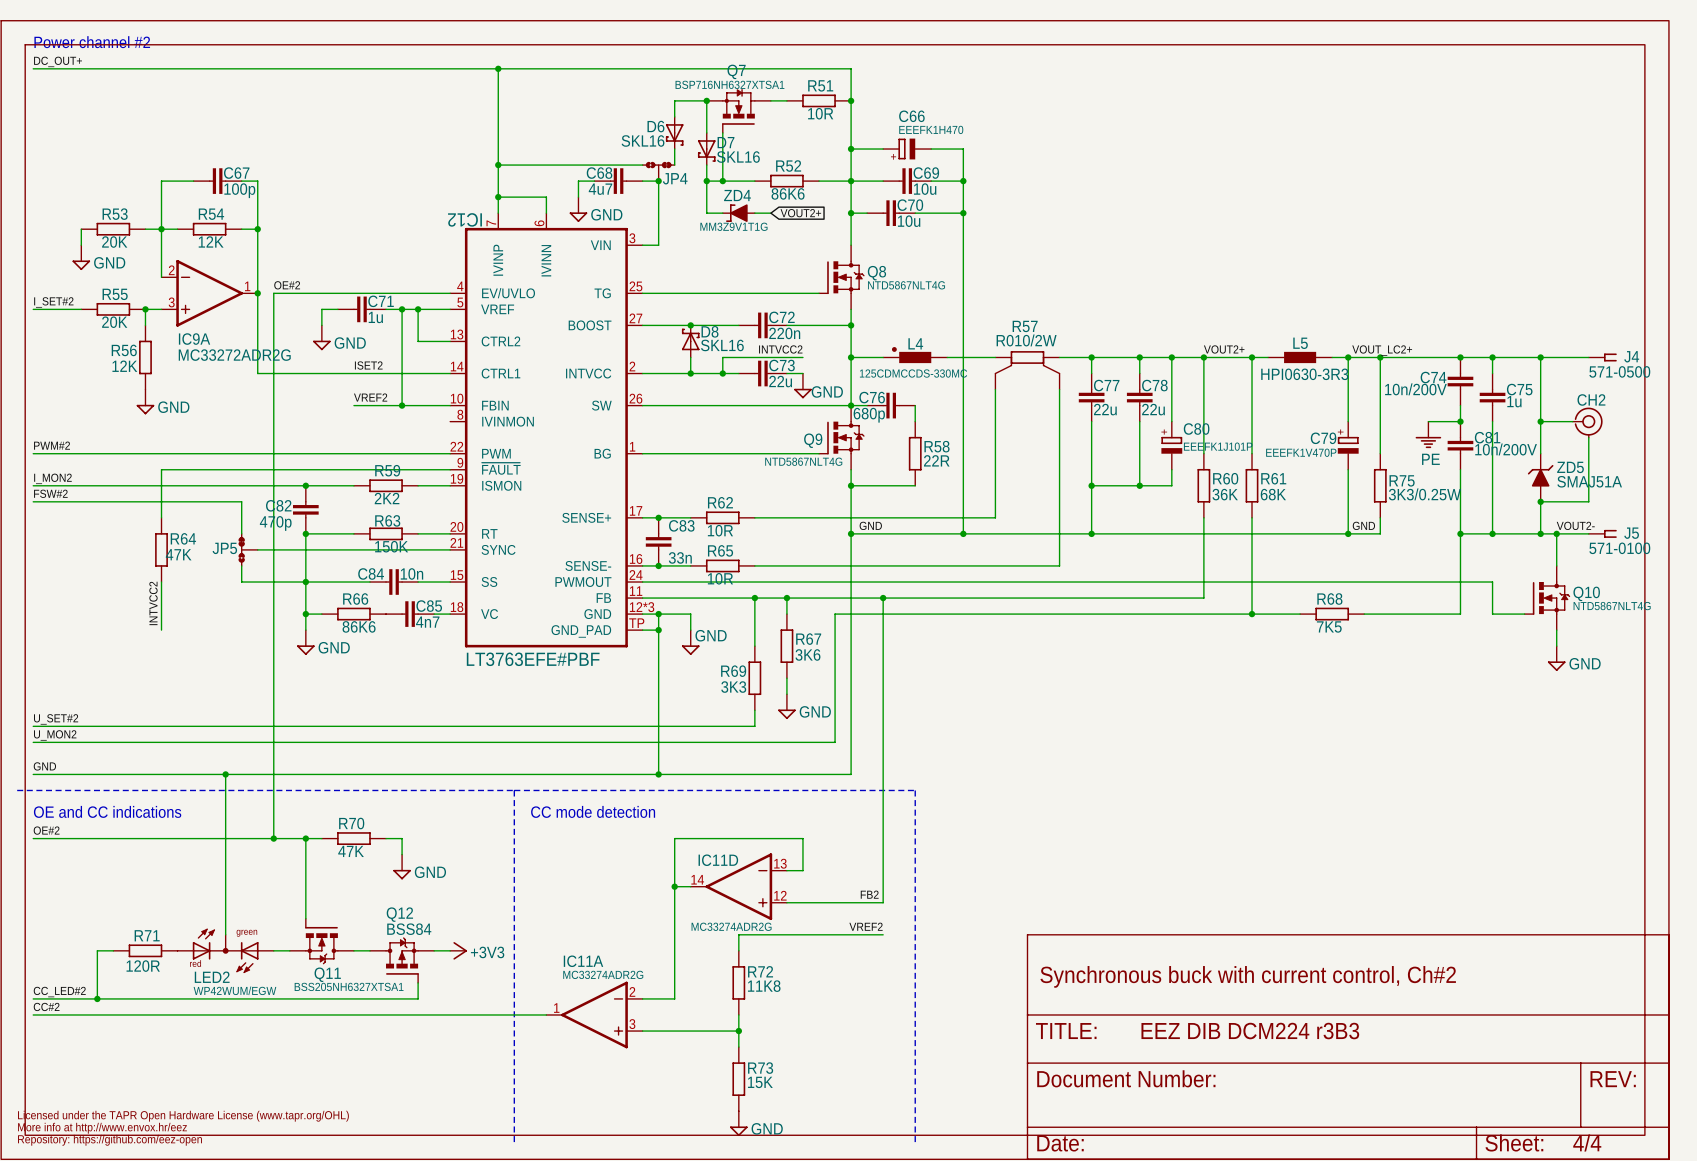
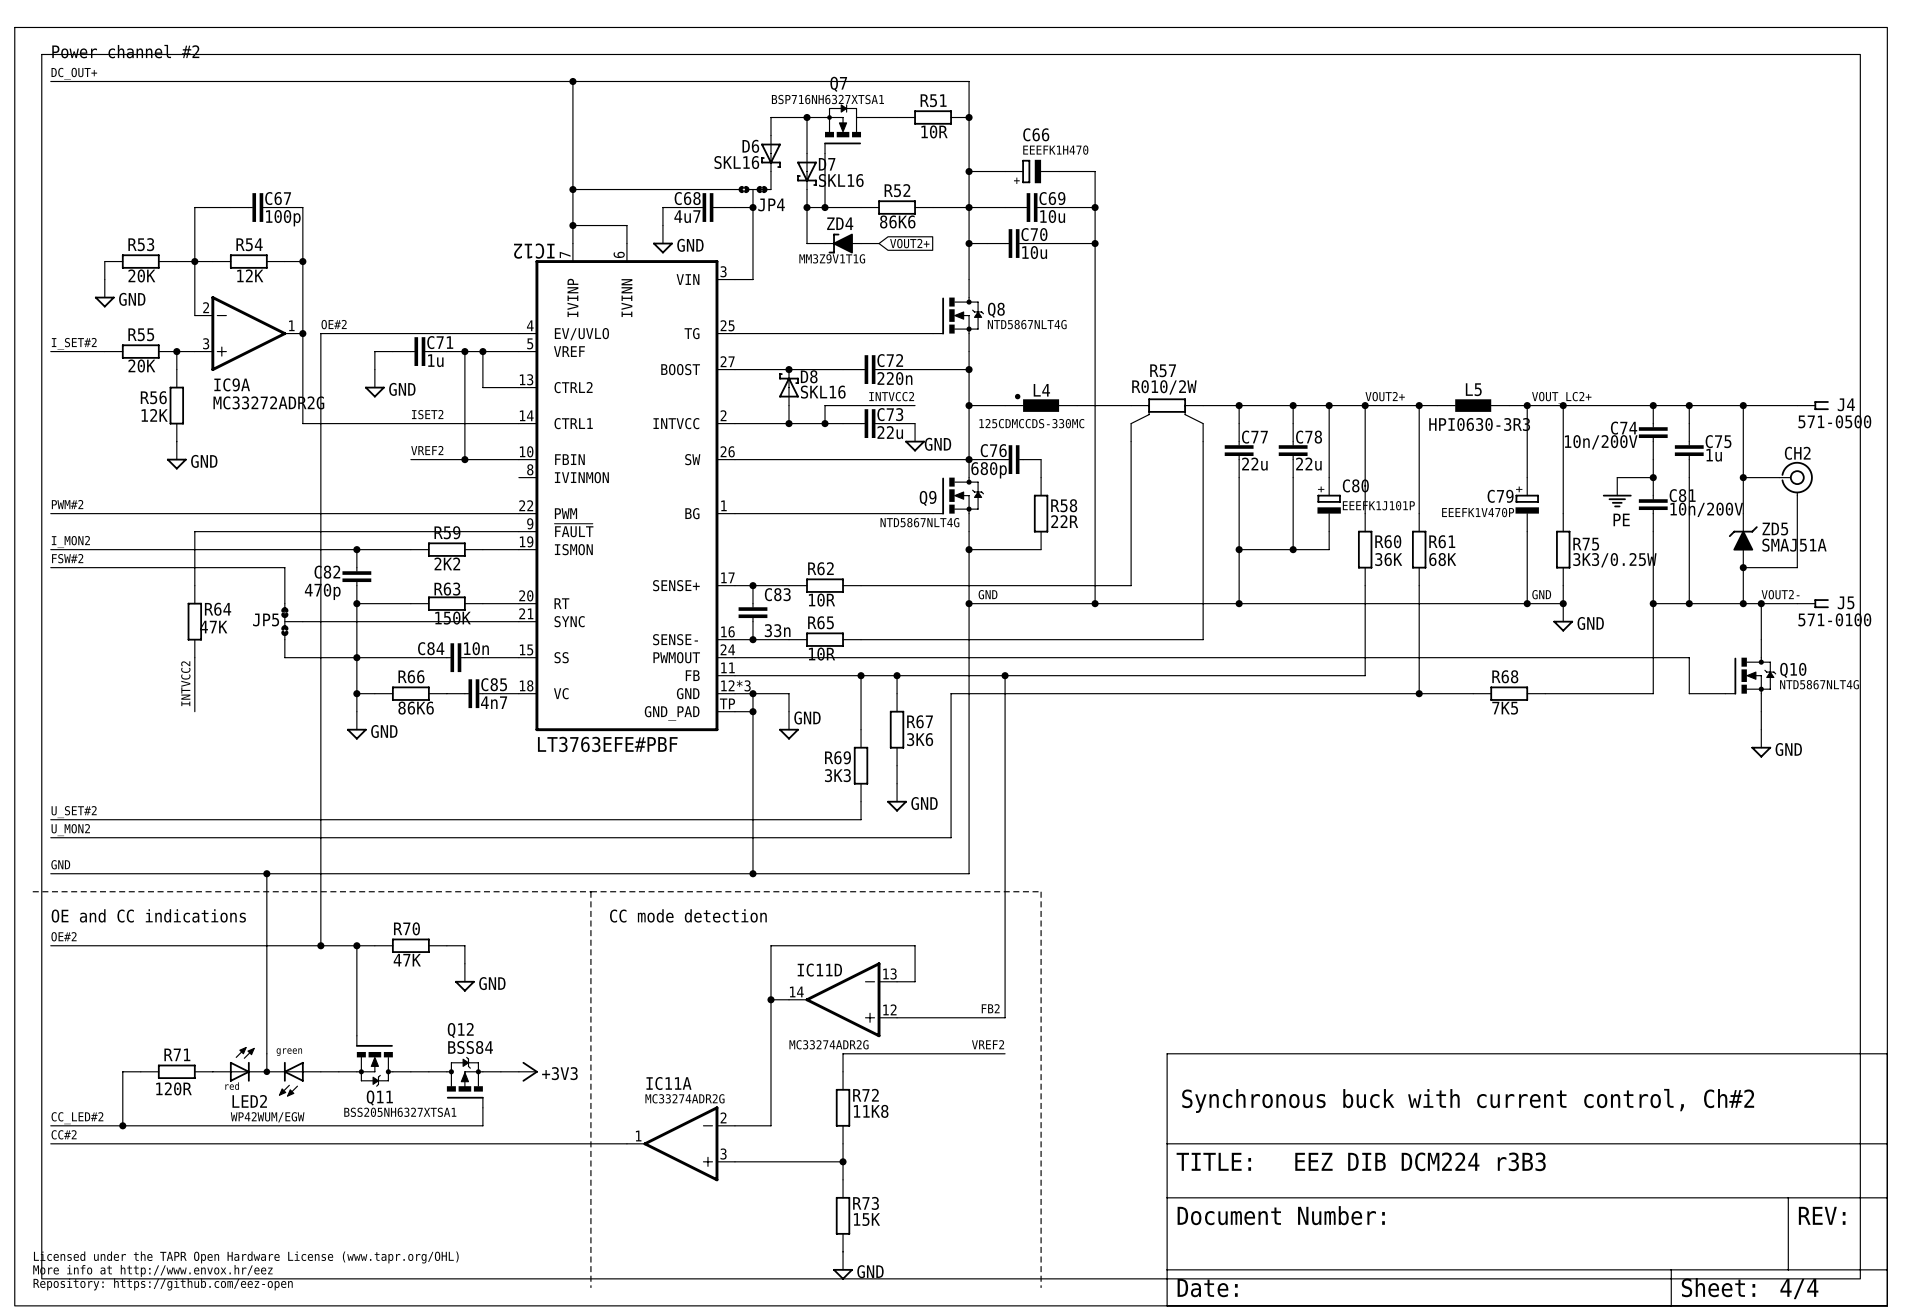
junction: none -> (1563, 603)
power symbol: none -> GND (1563, 617)

